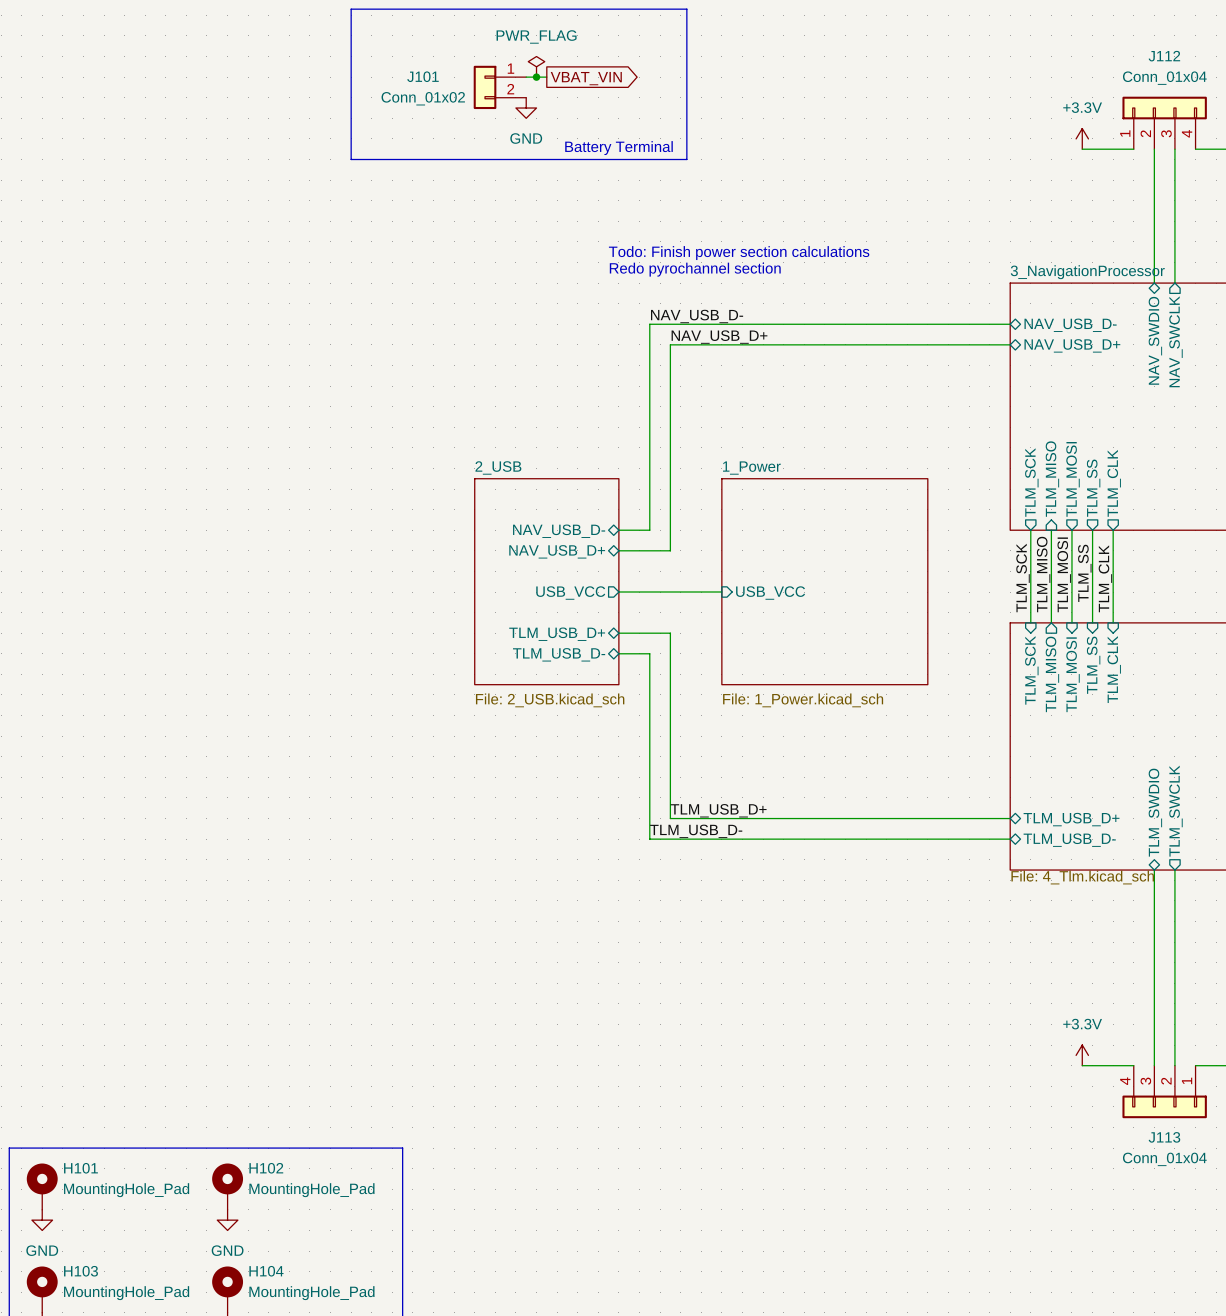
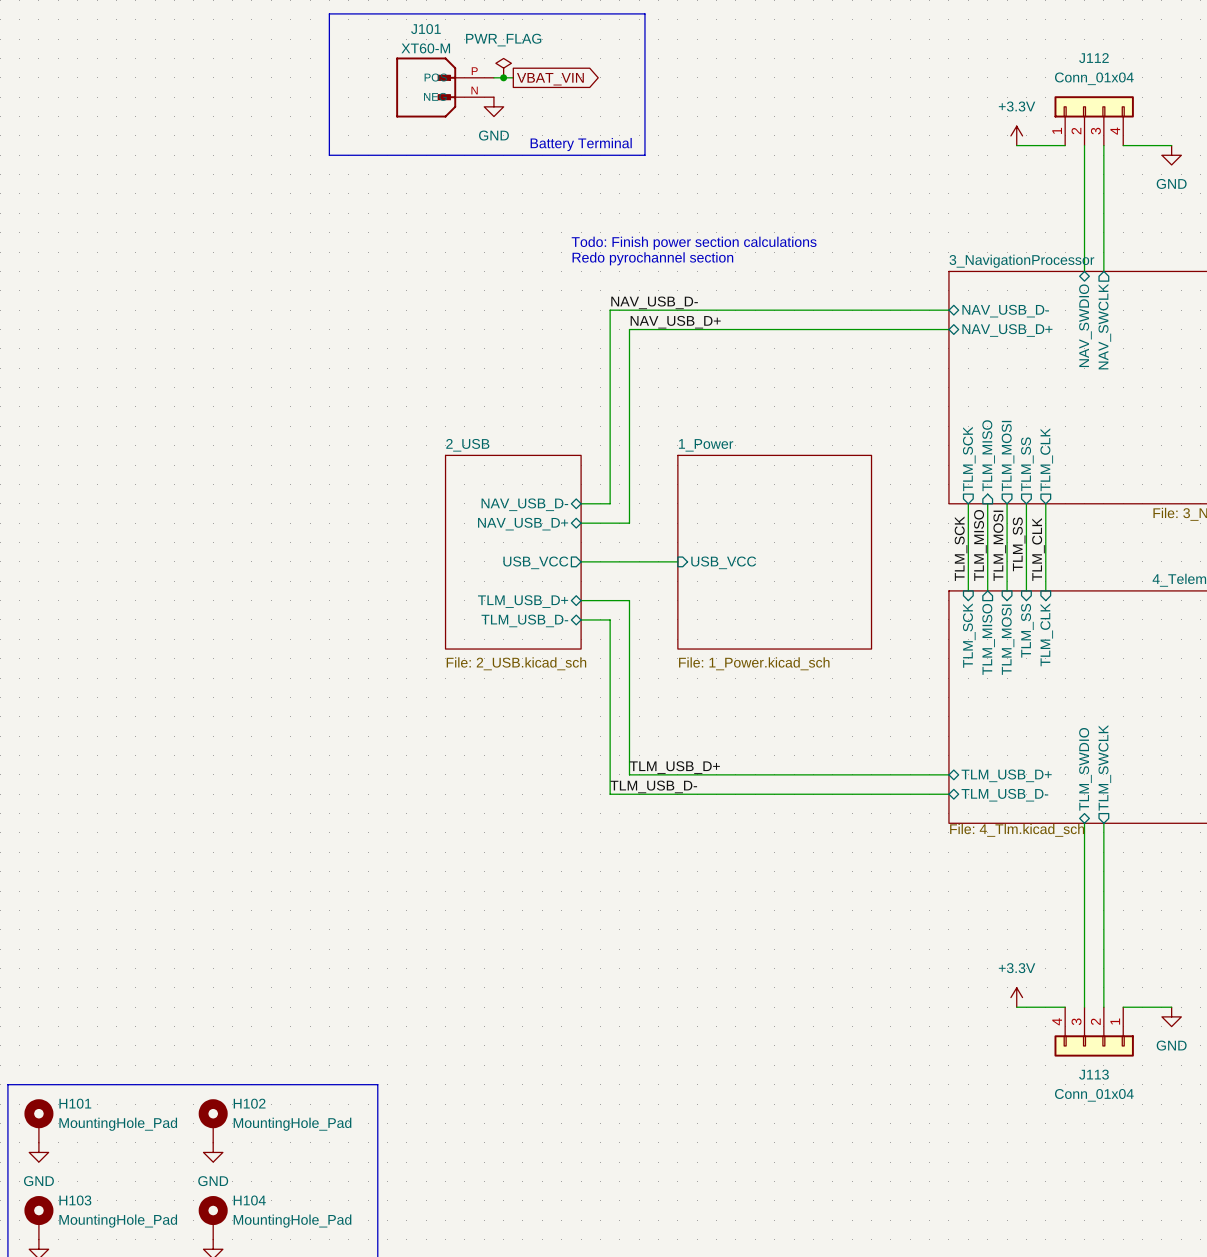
J101 symbol: [473, 65, 527, 110] -> [396, 57, 494, 118]
J101 name position: J101 (422, 76) -> J101 (425, 29)
J101 value: Conn_01x02 (423, 98) -> XT60-M (425, 48)

